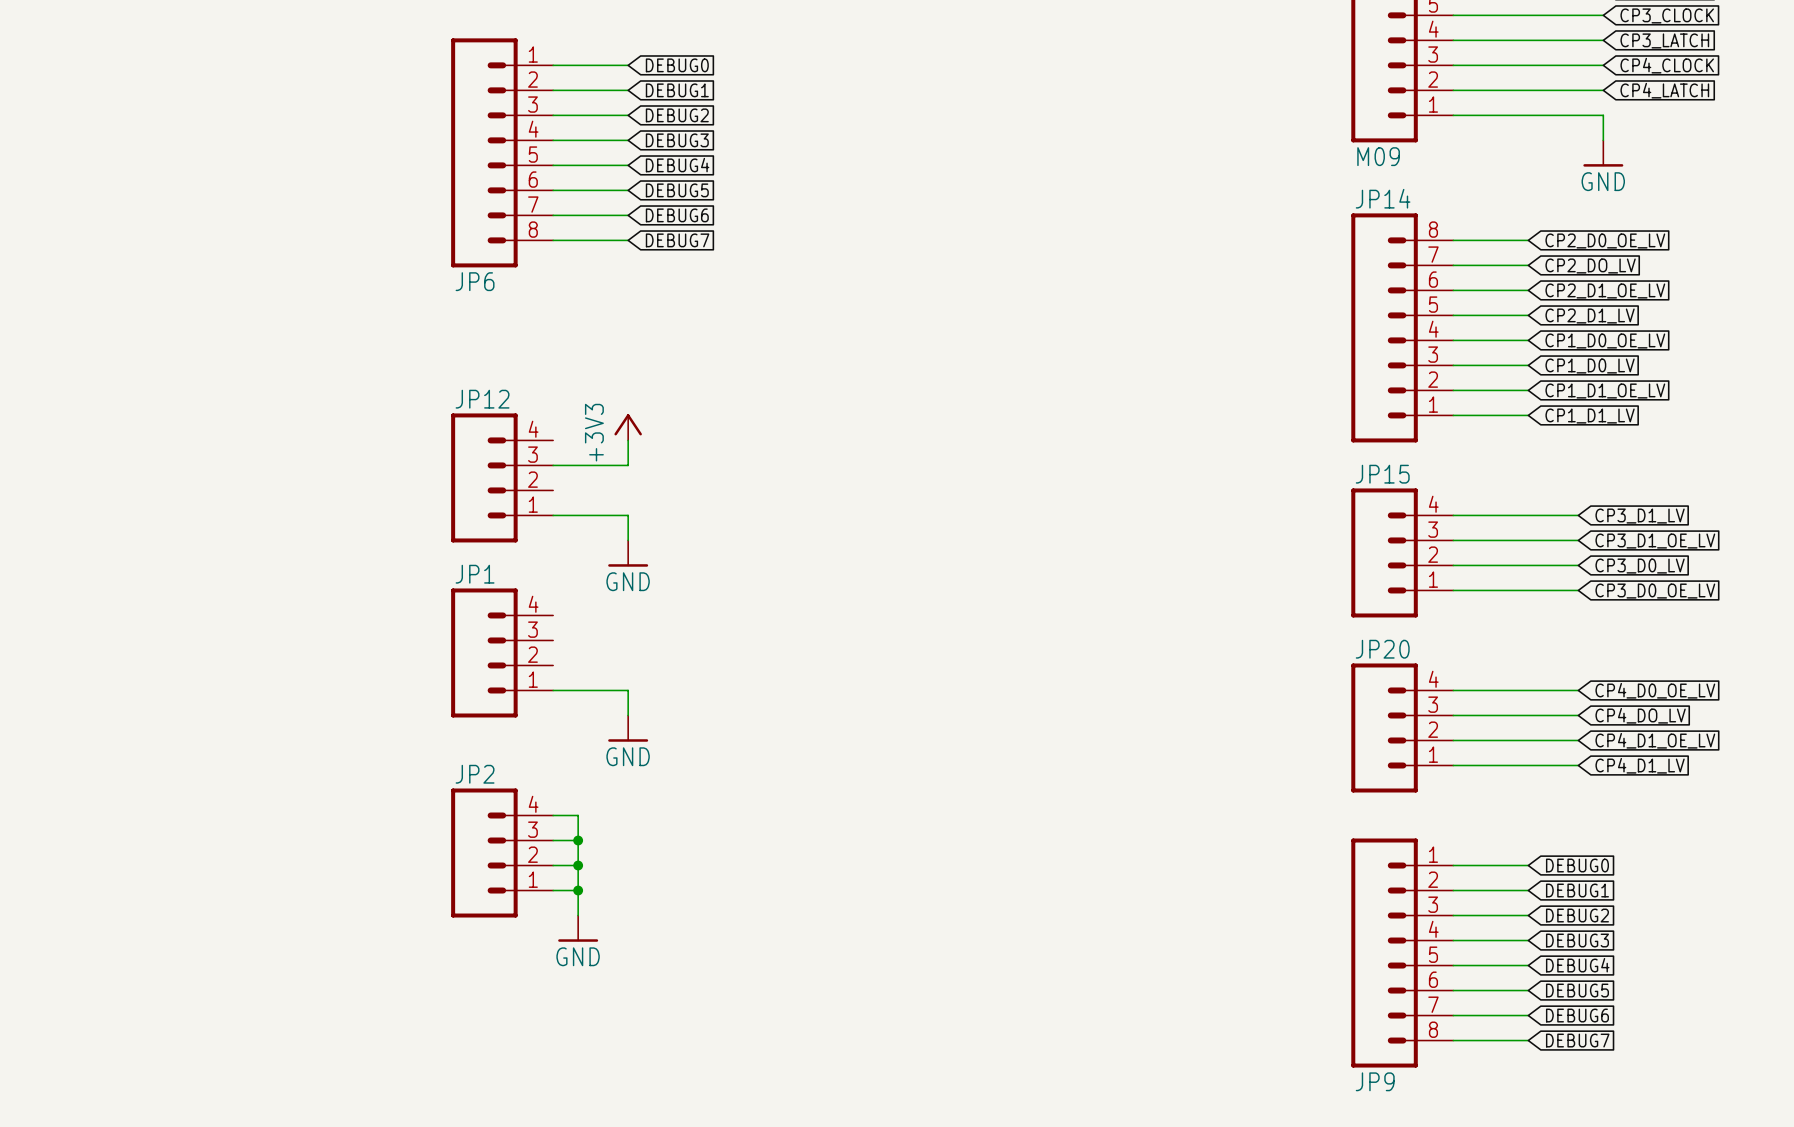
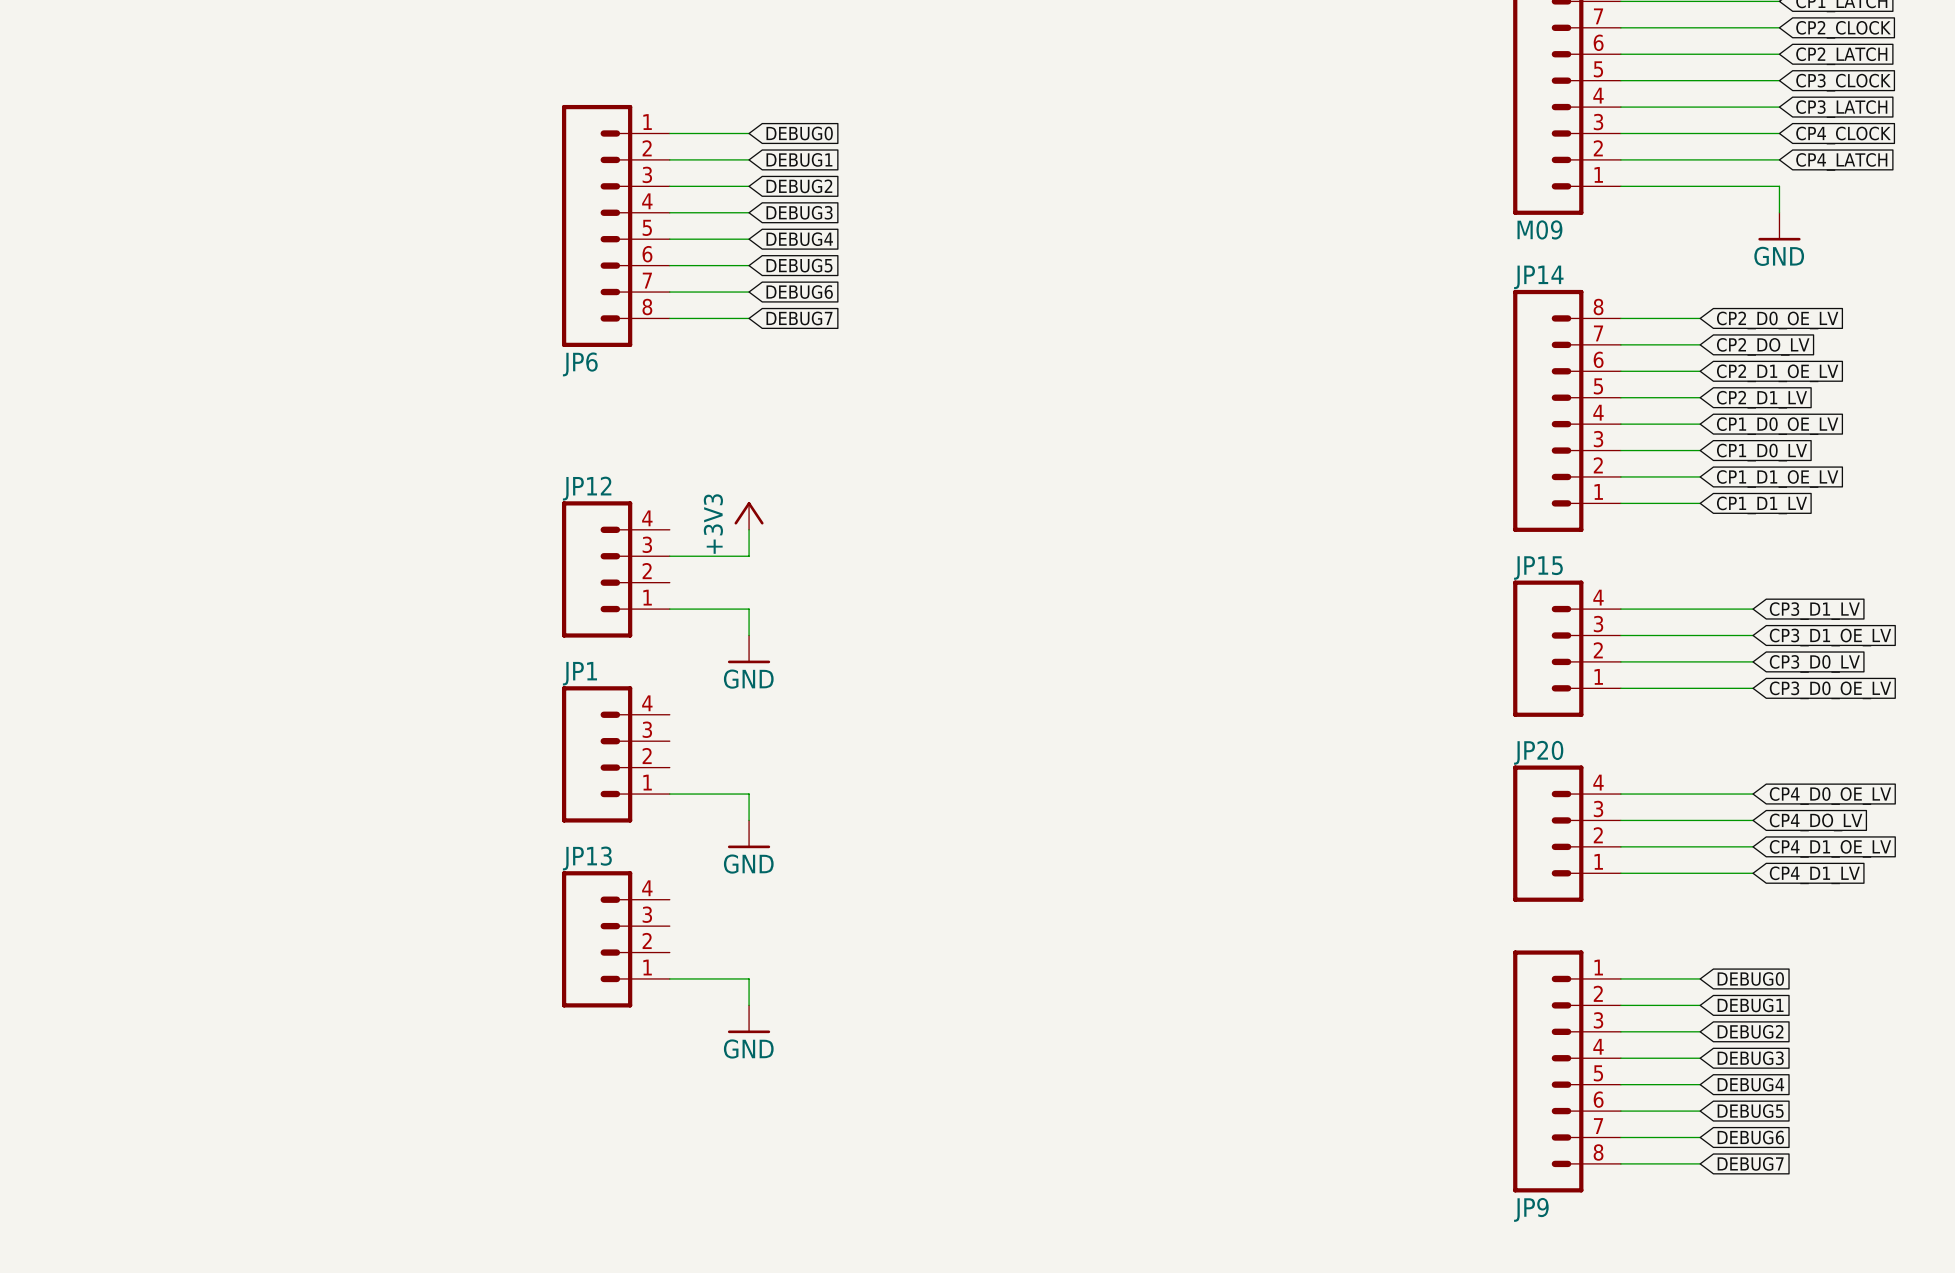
wire: (553, 815) (578, 815) (578, 915) -> none
JP13: none -> (615, 939)
wire: (553, 840) (578, 840) -> none
junction: (578, 840) -> none
JP2: (502, 853) -> none
wire: none -> (696, 978) (749, 978) (749, 1005)
junction: (578, 865) -> none
wire: (553, 890) (578, 890) -> none
junction: (578, 890) -> none
power symbol position: GND (578, 928) -> GND (749, 1019)

